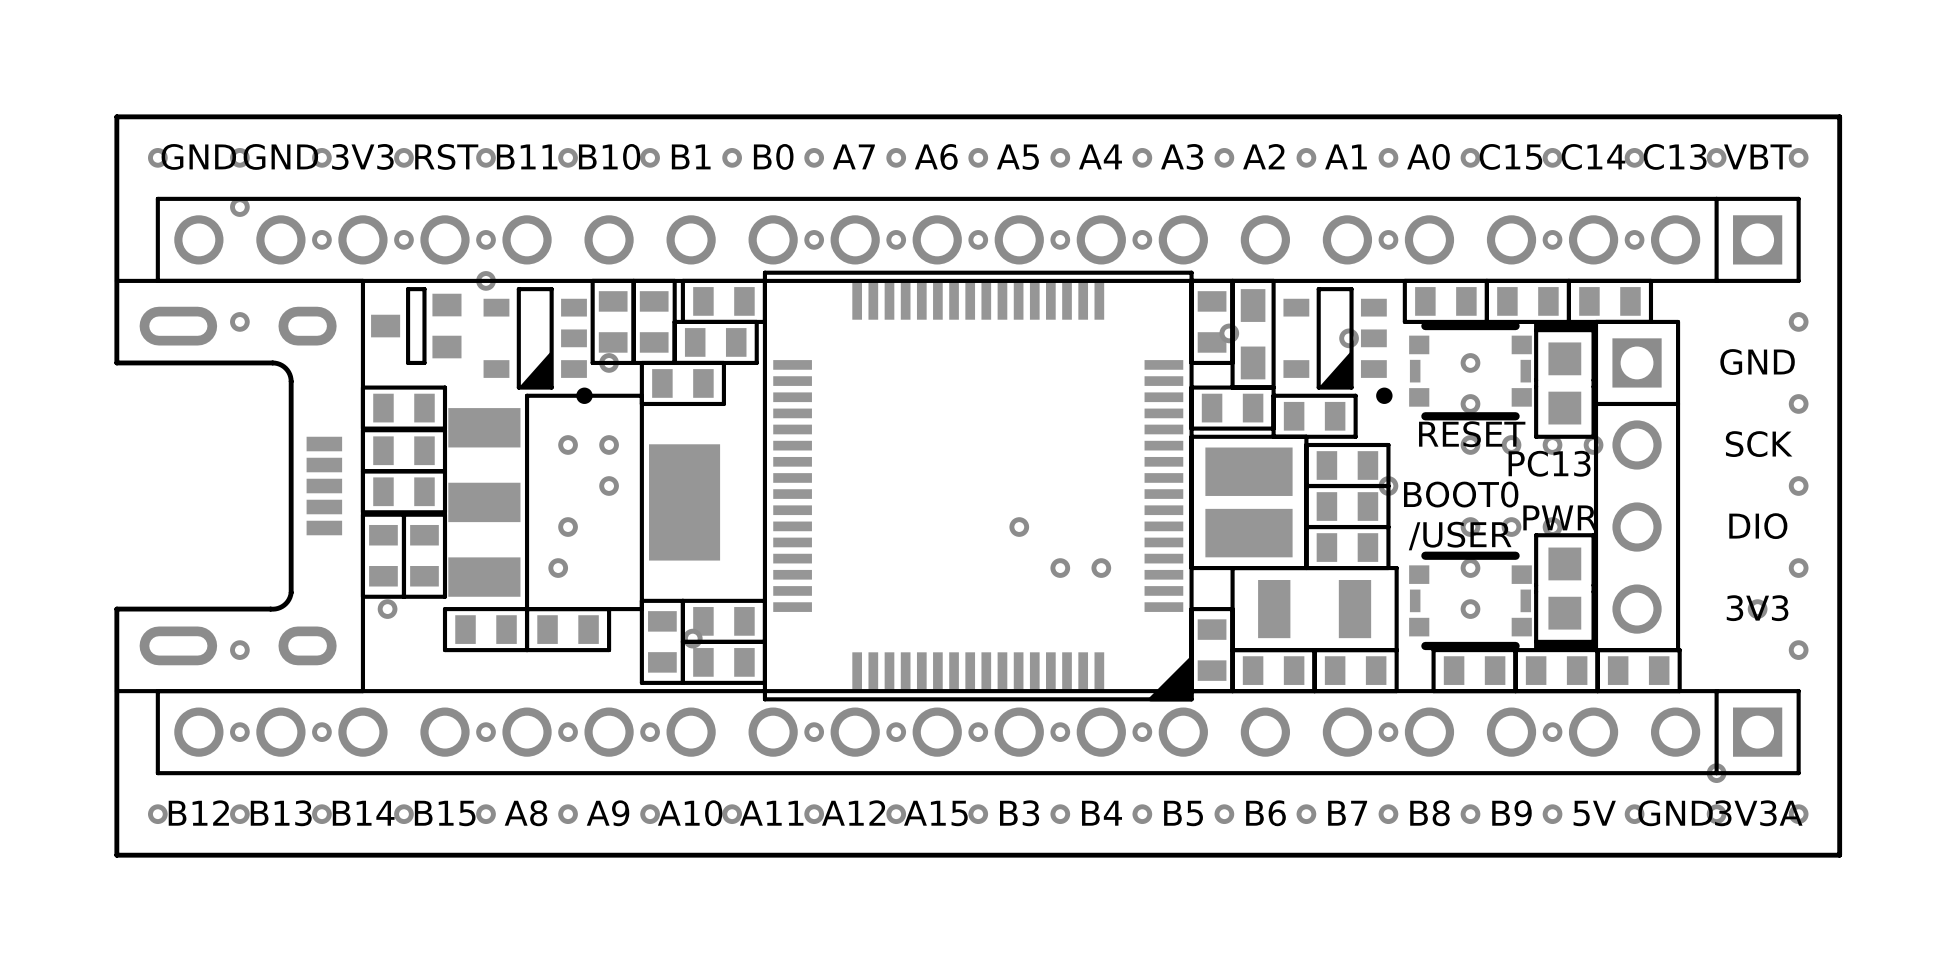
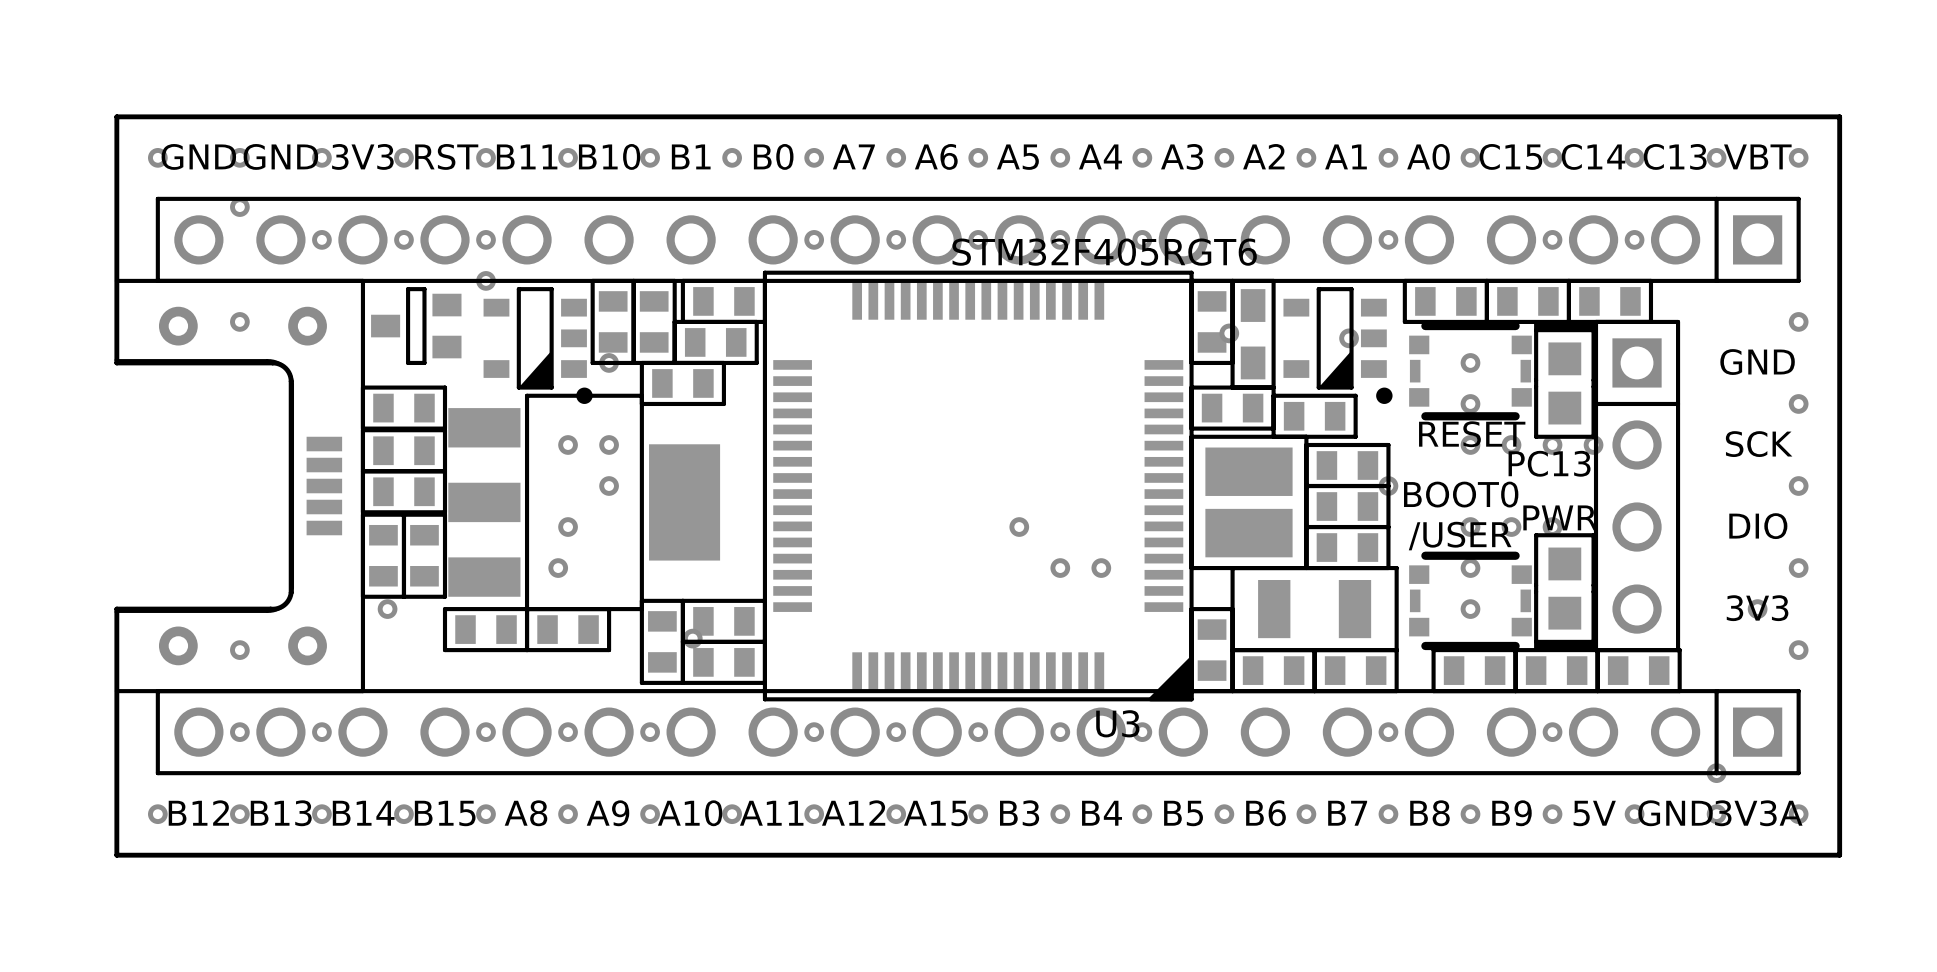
U3 value: none -> STM32F405RGT6 (1104, 252)
part footprint: [114, 278, 366, 694] -> [114, 278, 366, 694]
U3 name: none -> U3 (1117, 723)

